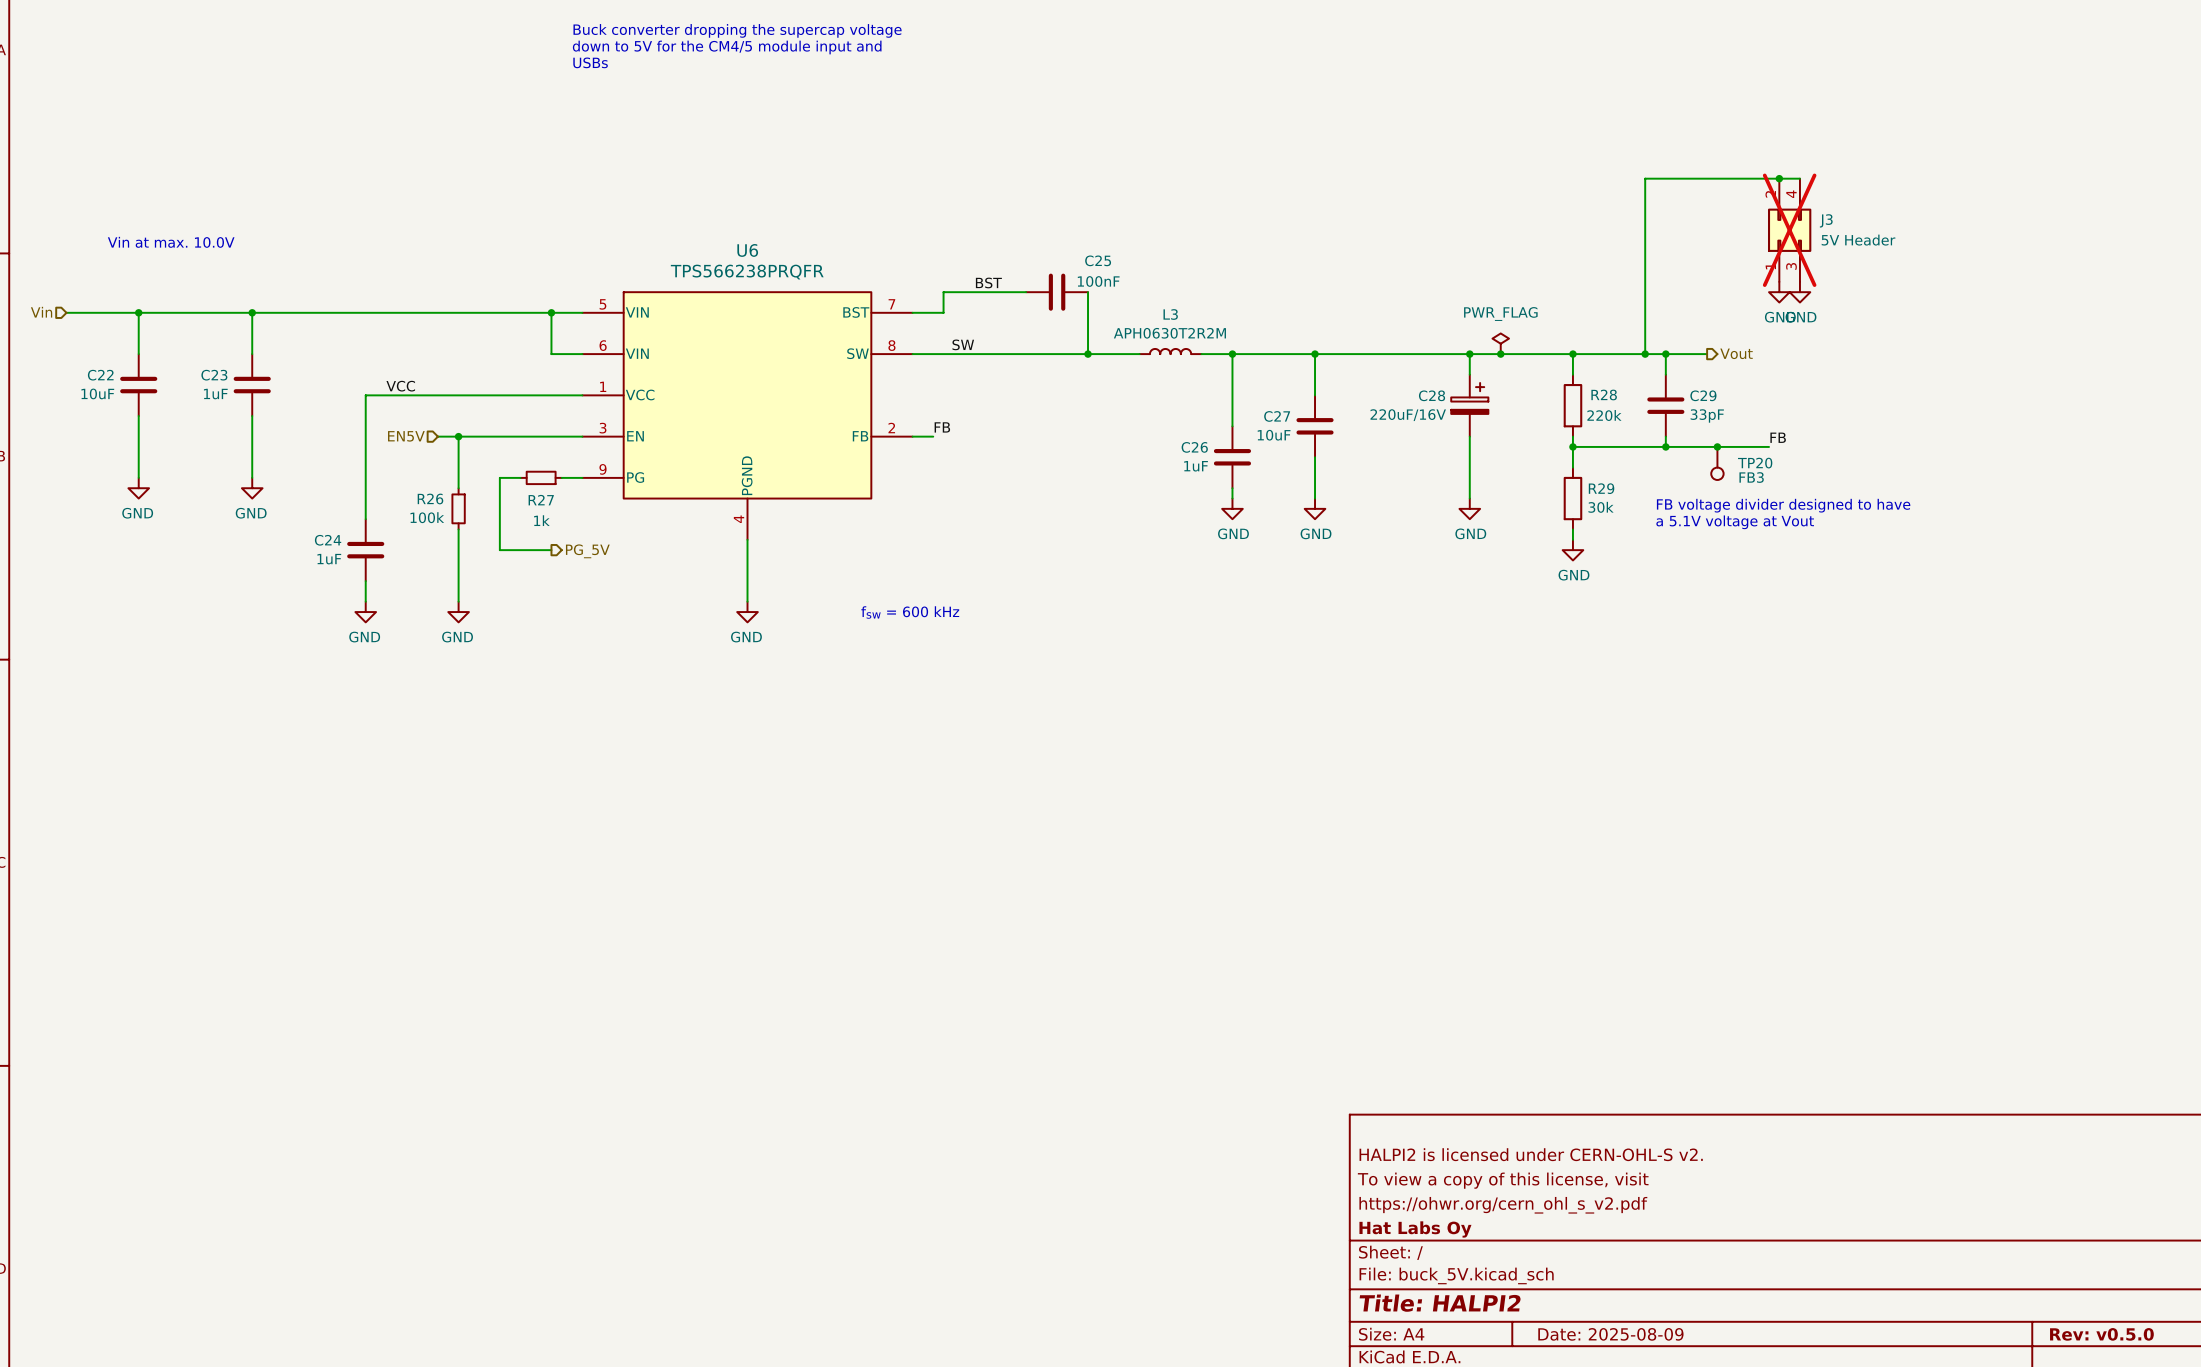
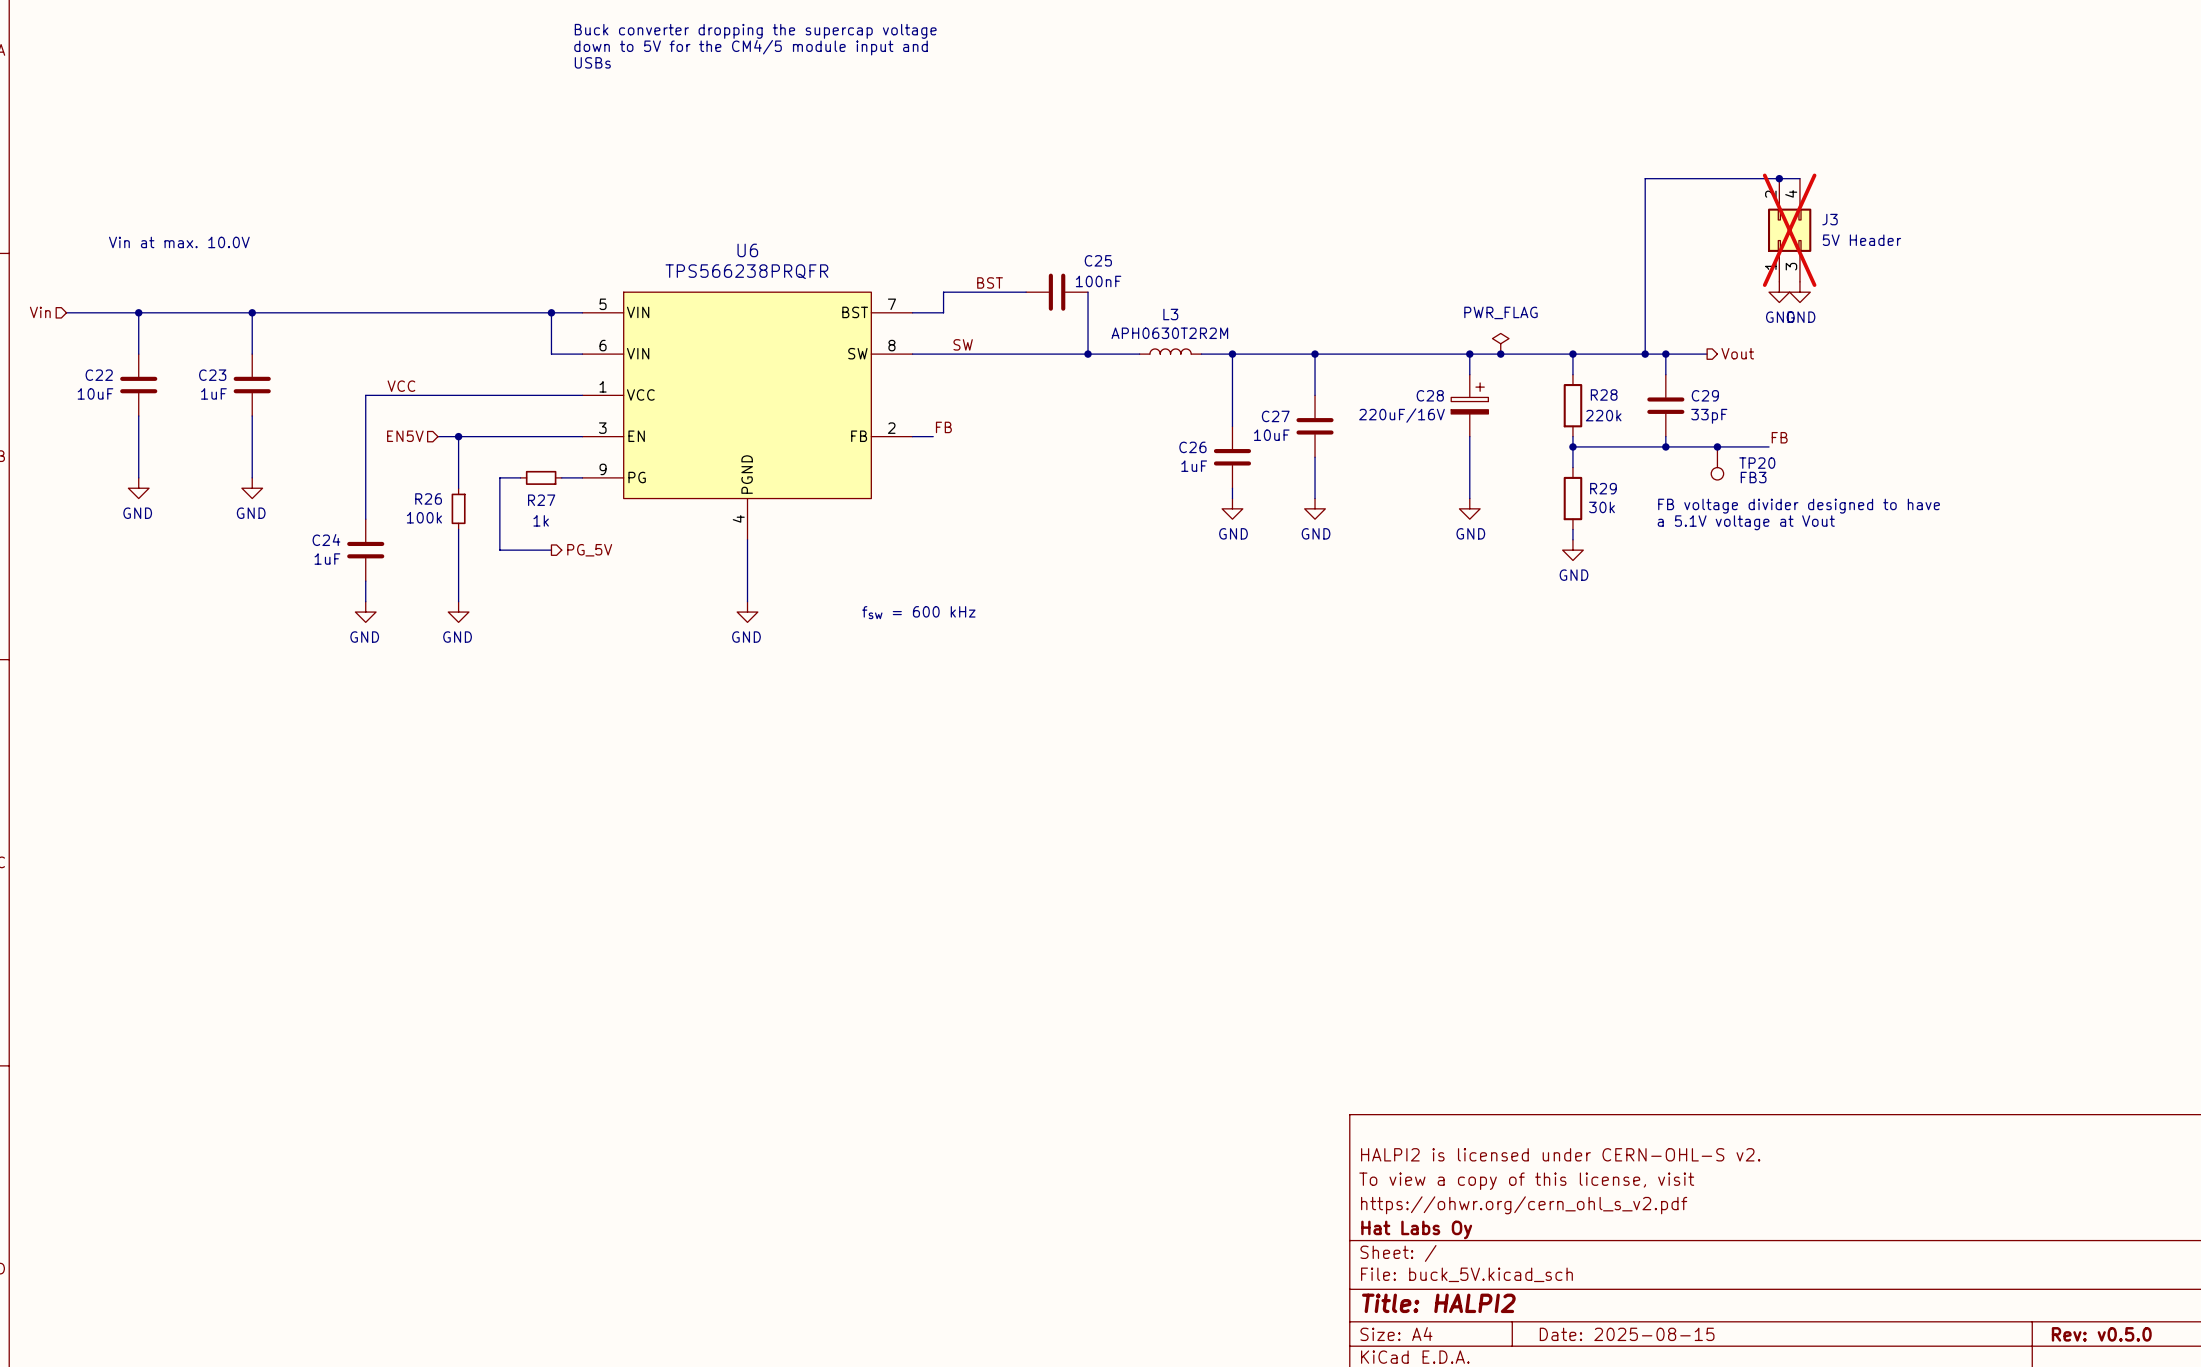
title block: Date: 2025-08-09 (1610, 1334) -> Date: 2025-08-15 (1627, 1334)

